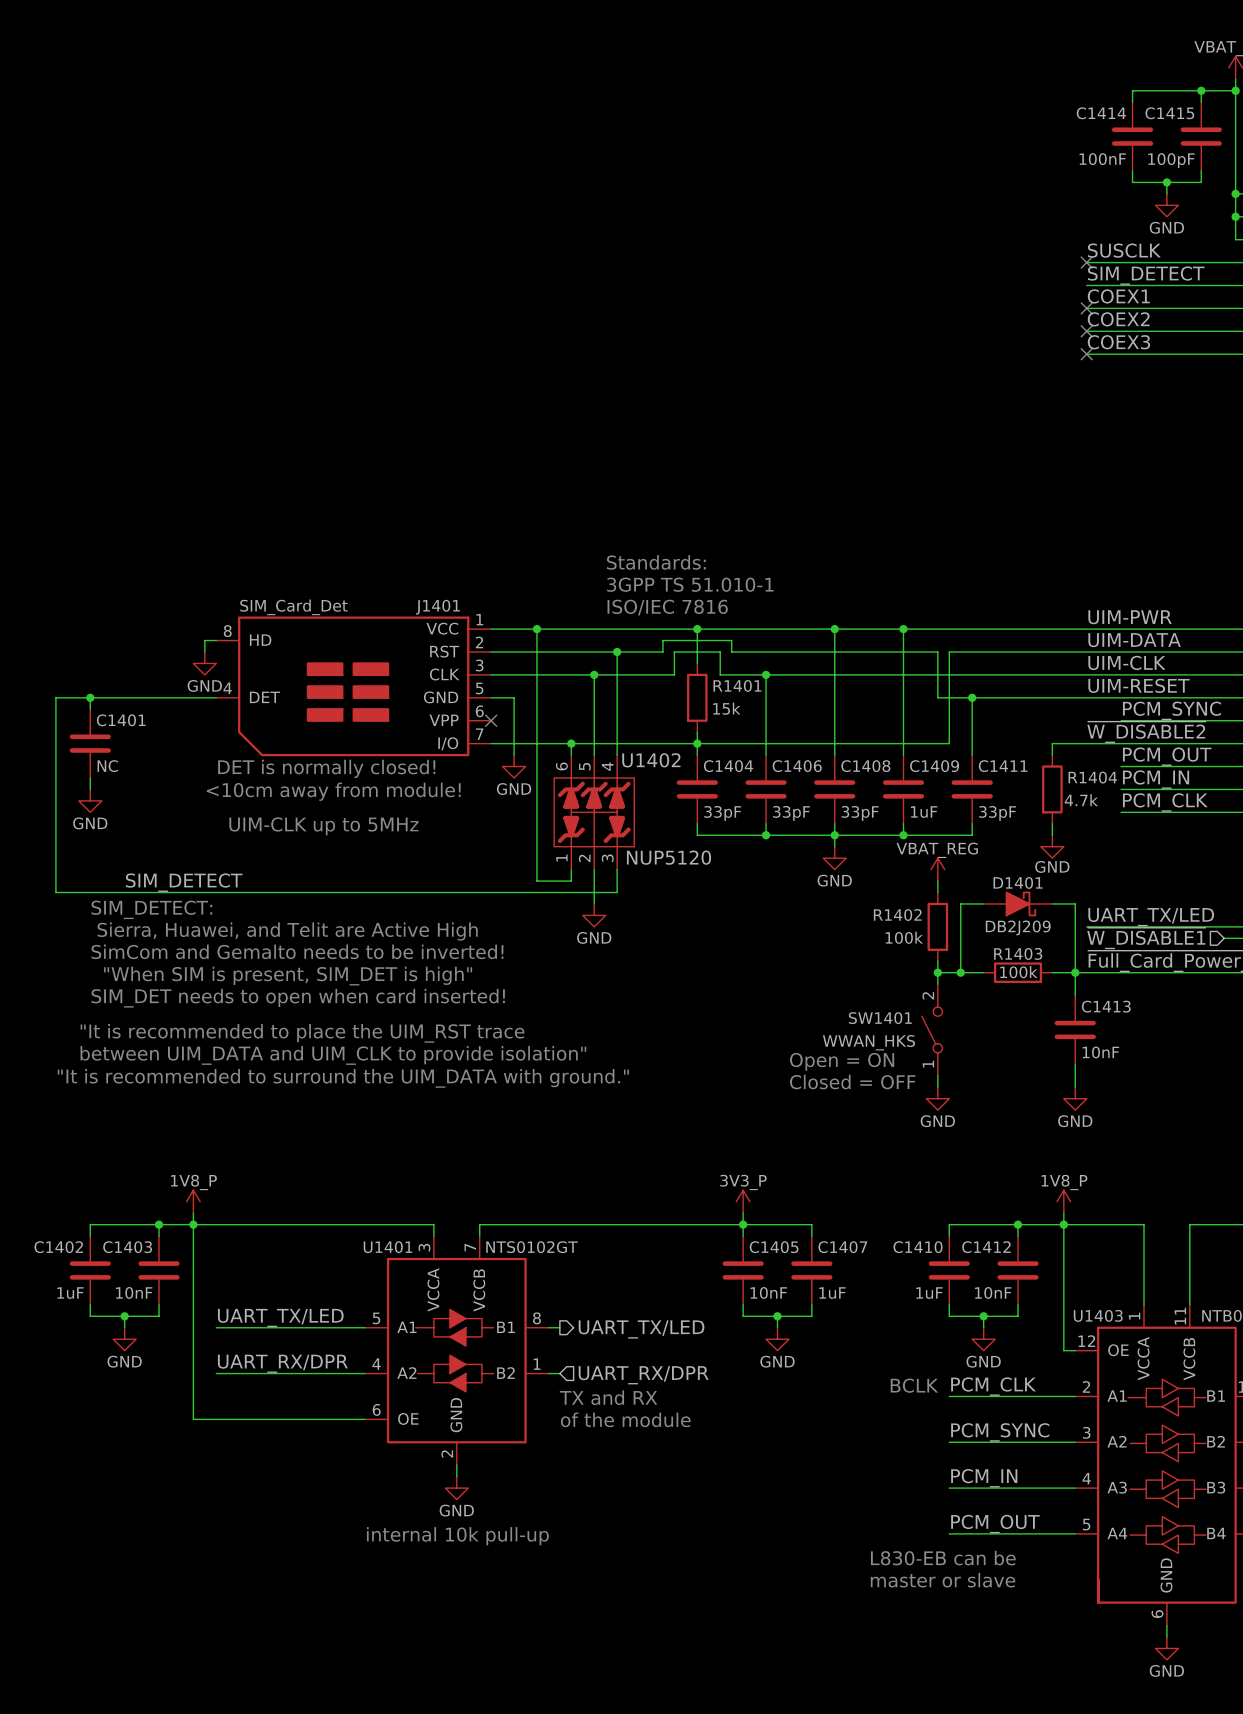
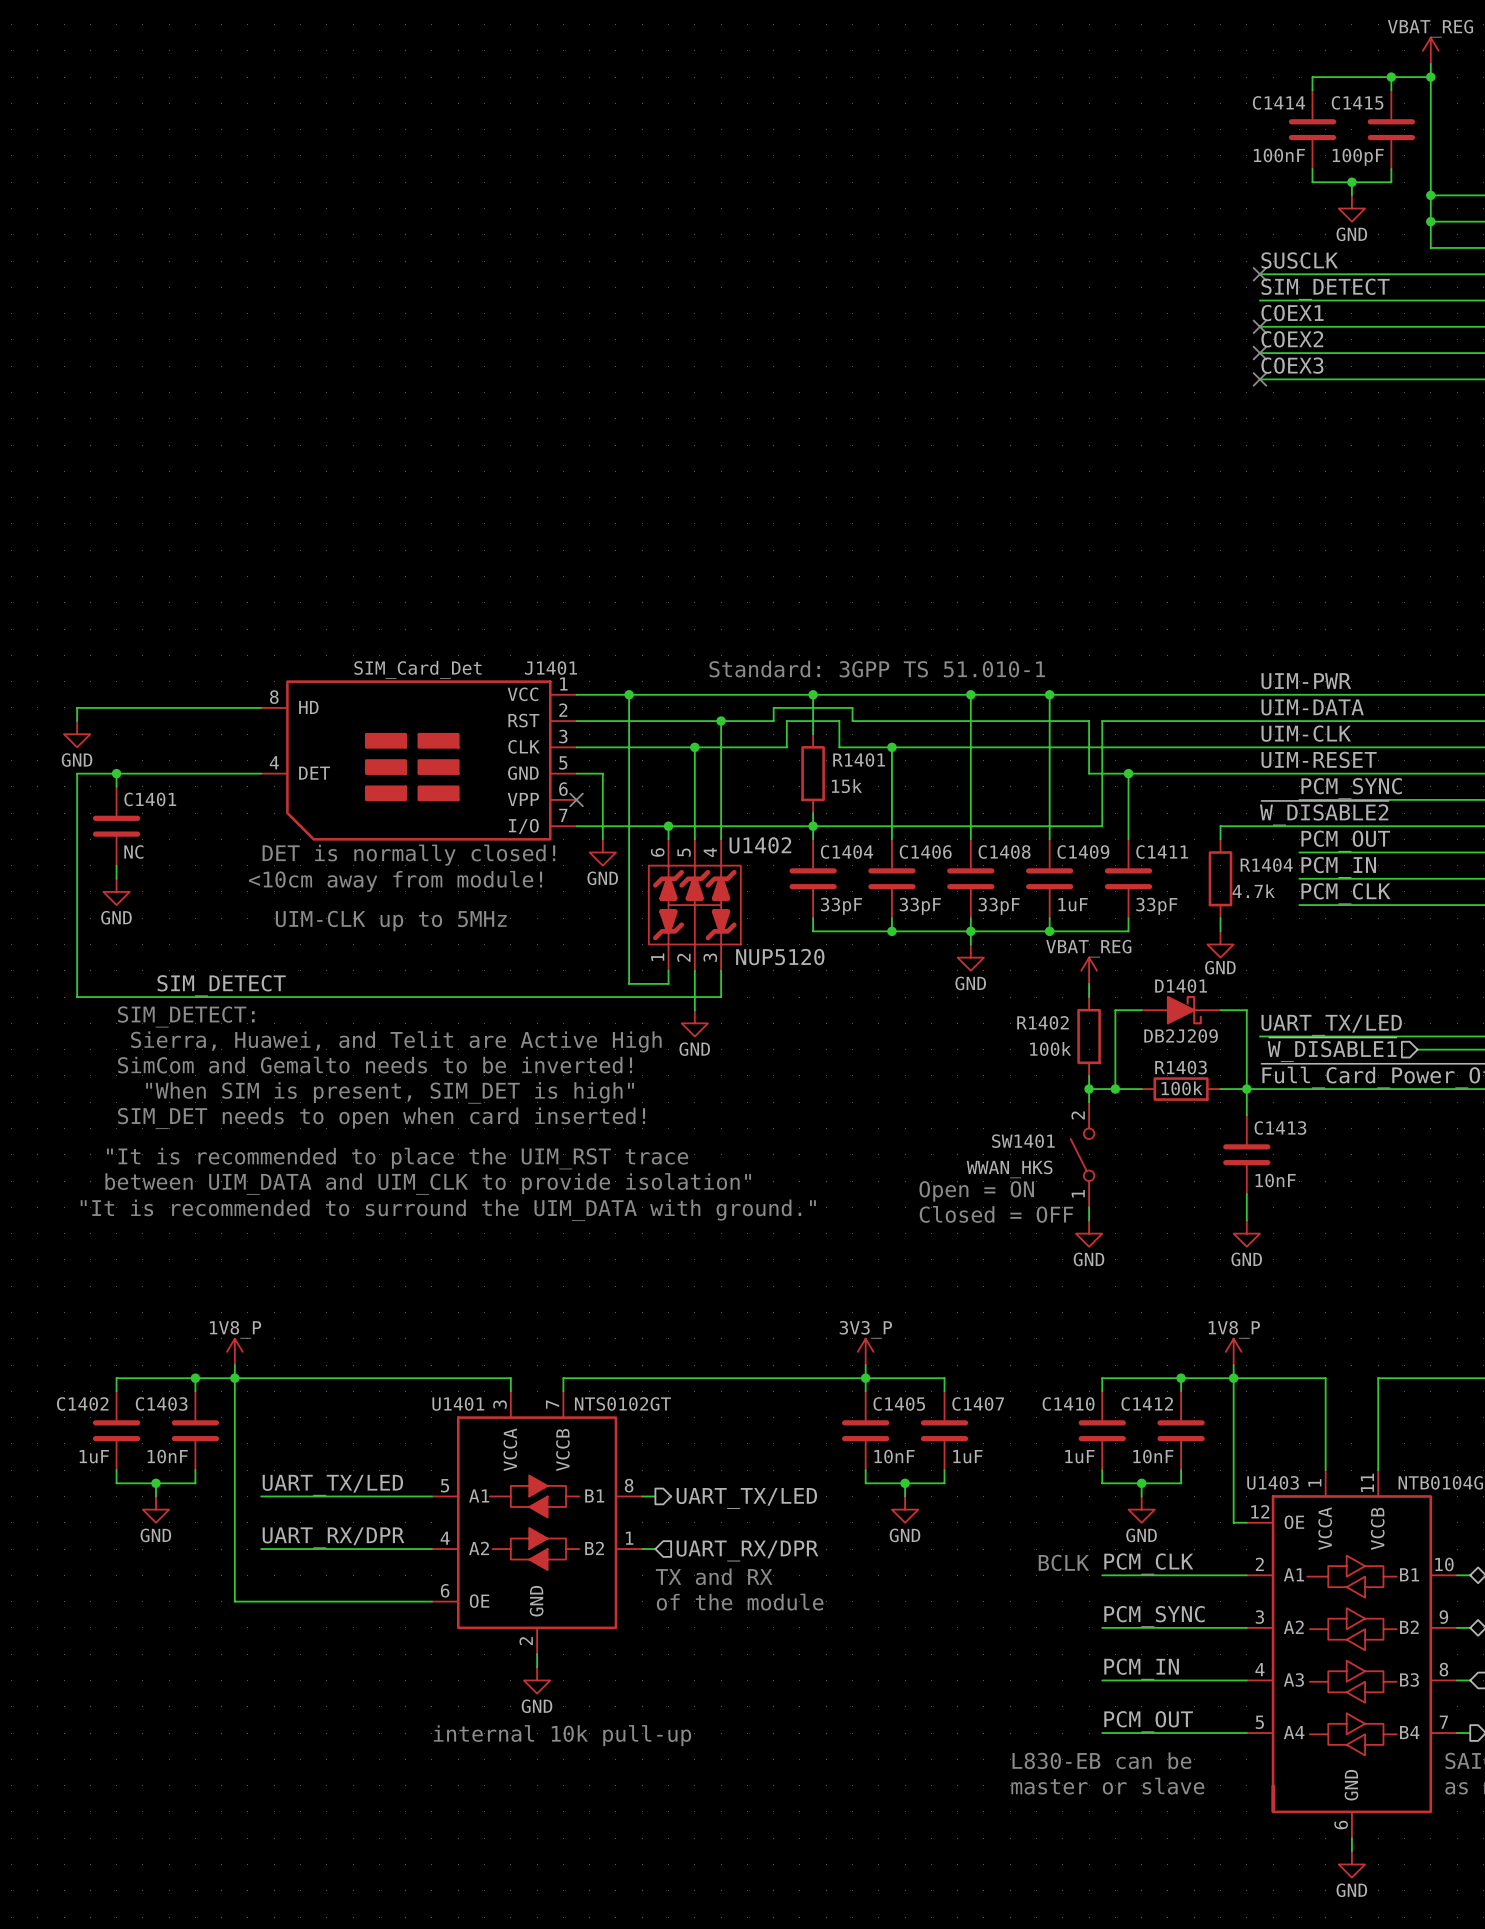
text: Standards: (656, 562) -> none
text: 3GPP TS 51.010-1 (690, 584) -> none
J1401 value position: SIM_Card_Det (293, 607) -> SIM_Card_Det (417, 669)
J1401 name position: J1401 (437, 607) -> J1401 (550, 668)
text: ISO/IEC 7816 (667, 607) -> Standard: 3GPP TS 51.010-1 (877, 669)
wire: (204, 640) (204, 652) -> (247, 707) (77, 707) (77, 721)
power symbol position: GND (204, 663) -> GND (77, 734)

